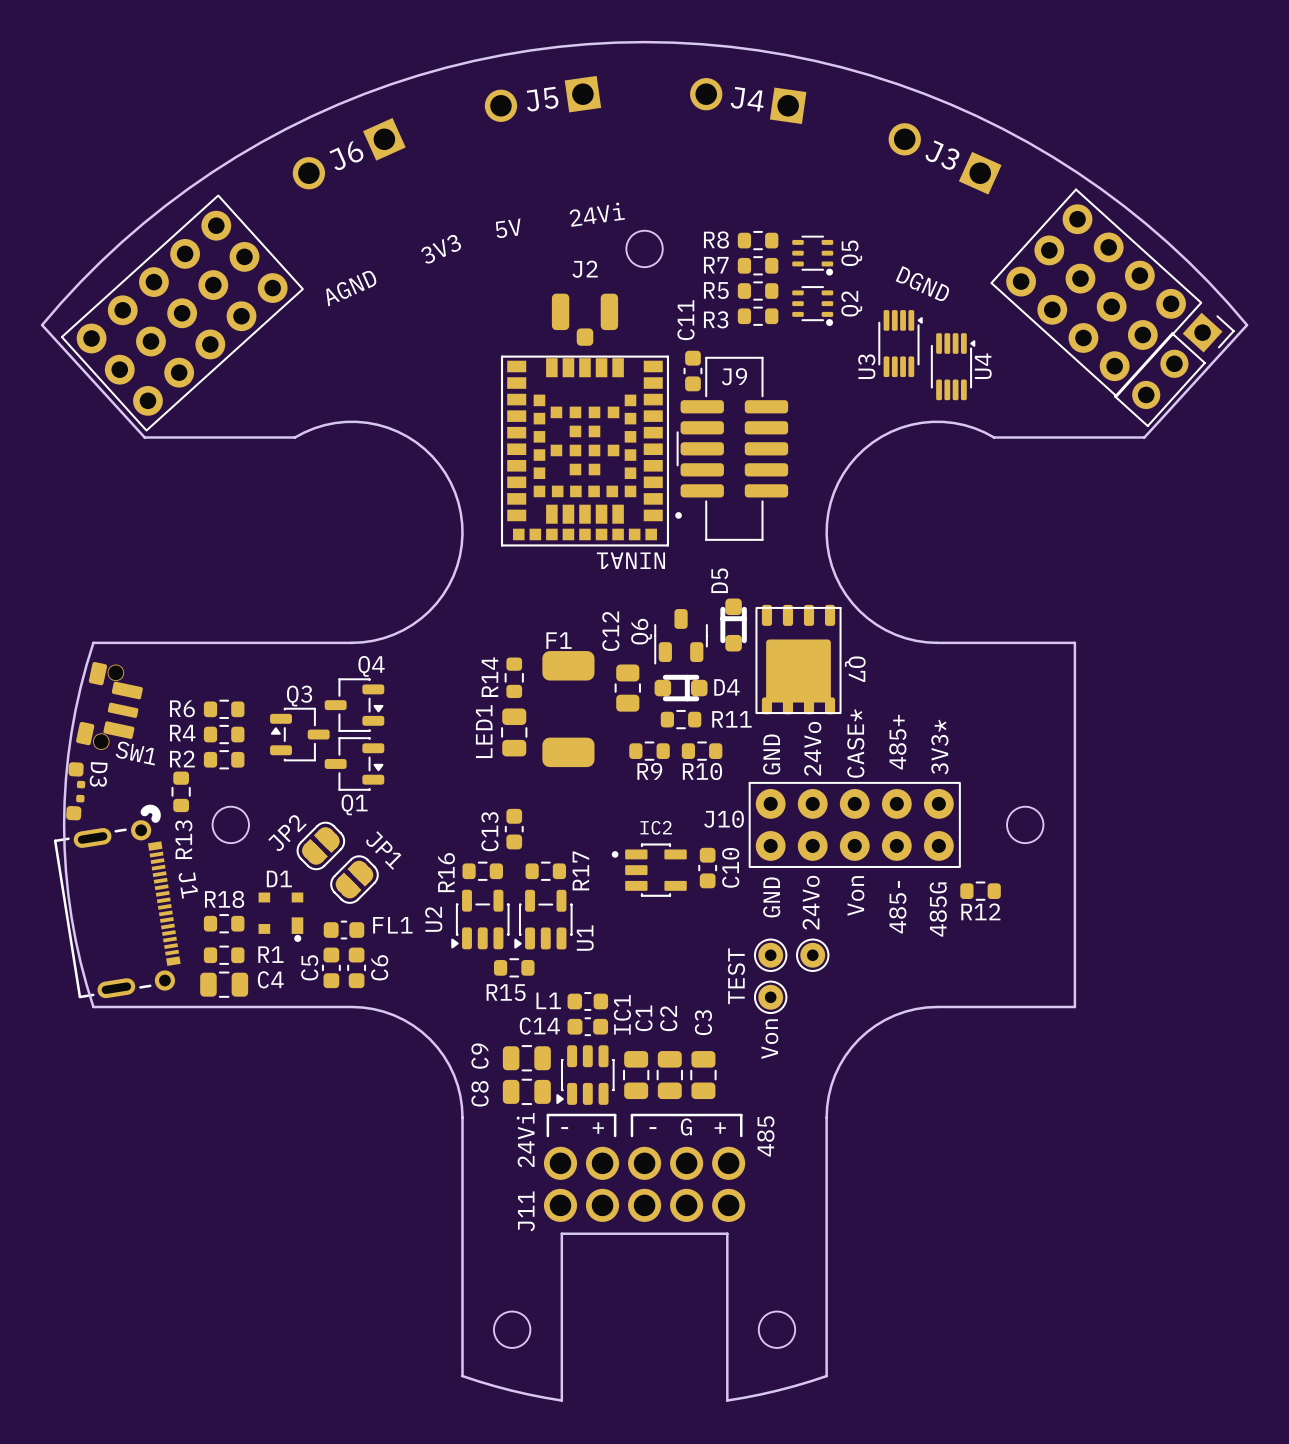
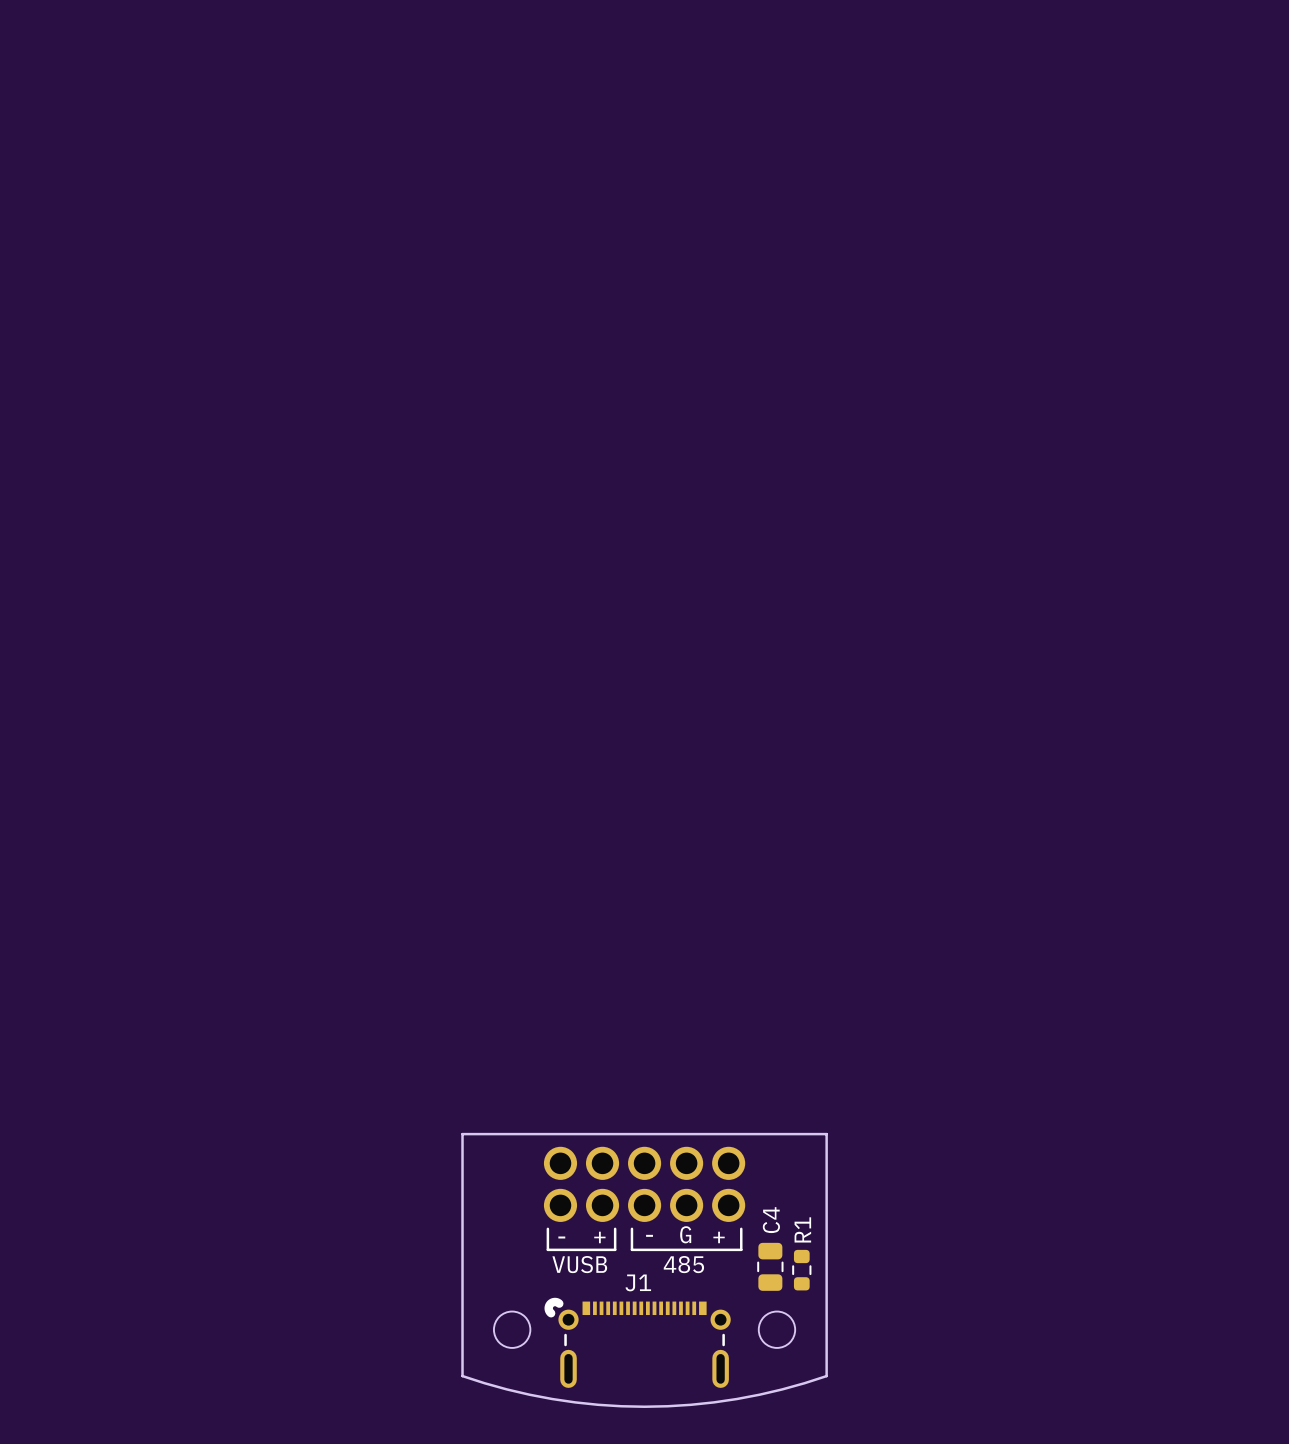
J5: (543, 98) -> none
J4: (748, 101) -> none
J6: (349, 153) -> none
J3: (945, 158) -> none
text: 24Vi (597, 214) -> none
text: 5V (508, 228) -> none
round board edge: [625, 229, 664, 268] -> none
R8: (758, 240) -> none
text: 3V3 (441, 249) -> none
Q5: (812, 255) -> none
R7: (758, 265) -> none
text: DGND (922, 283) -> none
text: AGND (351, 288) -> none
R5: (758, 291) -> none
part: (1096, 292) -> none
Q2: (812, 306) -> none
part: (182, 313) -> none
R3: (758, 316) -> none
J2: (584, 319) -> none
U3: (900, 343) -> none
U4: (953, 366) -> none
part: (1174, 369) -> none
C11: (692, 371) -> none
J9: (732, 448) -> none
NINA1: (591, 451) -> none
D5: (733, 625) -> none
Q6: (681, 636) -> none
Q7: (798, 659) -> none
R14: (514, 677) -> none
C12: (627, 688) -> none
D4: (681, 688) -> none
SW1: (109, 705) -> none
Q4: (354, 705) -> none
R6: (224, 709) -> none
F1: (568, 709) -> none
R11: (681, 719) -> none
LED1: (514, 732) -> none
R4: (224, 734) -> none
Q3: (299, 734) -> none
text: 485+ (897, 742) -> none
text: CASE* (855, 743) -> none
text: 3V3* (939, 747) -> none
text: 24Vo (812, 748) -> none
R9: (649, 751) -> none
R10: (702, 751) -> none
text: GND (771, 754) -> none
R2: (224, 759) -> none
Q1: (354, 763) -> none
D3: (75, 791) -> none
R13: (181, 791) -> none
J1 footprint: [53, 804, 181, 999] -> [544, 1297, 731, 1388]
round board edge: [211, 805, 250, 844] -> none
round board edge: [1006, 805, 1045, 844] -> none
J10: (854, 824) -> none
C13: (514, 829) -> none
JP2: (320, 845) -> none
C10: (707, 868) -> none
IC2: (649, 870) -> none
R16: (482, 871) -> none
R17: (545, 871) -> none
JP1: (354, 879) -> none
J1 name position: J1 (188, 885) -> J1 (638, 1282)
R12: (980, 891) -> none
text: Von (855, 895) -> none
text: GND (771, 897) -> none
text: 24Vo (811, 902) -> none
text: 485- (897, 907) -> none
text: 485G (938, 909) -> none
D1: (280, 917) -> none
U2: (480, 919) -> none
U1: (543, 919) -> none
R18: (224, 923) -> none
FL1: (343, 930) -> none
R1 name position: R1 (270, 954) -> R1 (802, 1229)
R1 rotation: 0° (224, 955) -> 90° clockwise (801, 1270)
R1 position: (224, 955) -> (801, 1270)
part: (770, 955) -> none
part: (812, 955) -> none
C5: (331, 967) -> none
C6: (356, 967) -> none
R15: (514, 967) -> none
text: TEST (736, 976) -> none
C4 name position: C4 (270, 979) -> C4 (771, 1220)
C4 rotation: 0° (224, 984) -> 90° clockwise (770, 1266)
C4 position: (224, 984) -> (770, 1266)
part: (770, 997) -> none
L1: (587, 1001) -> none
C14: (587, 1026) -> none
text: Von (769, 1039) -> none
C9: (526, 1058) -> none
IC1: (585, 1075) -> none
C1: (636, 1075) -> none
C2: (669, 1075) -> none
C3: (703, 1075) -> none
C8: (526, 1091) -> none
text position: G (686, 1127) -> G (685, 1234)
text: - (564, 1128) -> none
text: + (598, 1128) -> none
text: - (652, 1128) -> none
text: + (720, 1128) -> none
board edge: (462, 1134) (460, 1095) (454, 1075) (443, 1056) (430, 1039) (413, 1025) (384, 1011) (351, 1006) (93, 1006) (80, 962) (71, 917) (65, 871) (64, 824) (65, 778) (71, 732) (80, 687) (93, 642) (351, 642) (373, 640) (393, 634) (421, 618) (436, 603) (448, 585) (457, 566) (461, 545) (462, 523) (458, 502) (450, 482) (432, 456) (416, 442) (387, 427) (367, 422) (335, 423) (314, 428) (295, 437) (144, 437) (42, 325) (100, 262) (165, 205) (236, 157) (311, 116) (391, 84) (474, 60) (558, 46) (644, 42) (730, 46) (815, 60) (897, 84) (977, 116) (1053, 157) (1123, 205) (1188, 262) (1247, 325) (1144, 437) (994, 437) (964, 425) (943, 421) (922, 422) (891, 431) (872, 442) (849, 464) (838, 482) (830, 502) (826, 523) (827, 545) (831, 566) (840, 585) (852, 603) (876, 624) (905, 638) (926, 642) (1074, 642) (1074, 1006) (926, 1007) (905, 1011) (885, 1020) (859, 1039) (839, 1065) (828, 1095) (826, 1134) -> (462, 1134) (826, 1134)
line: (547, 1136) (547, 1115) (615, 1115) (615, 1136) -> none
line: (631, 1136) (631, 1115) (741, 1115) (741, 1136) -> none
text rotation: 0° (765, 1136) -> 90° clockwise (683, 1264)
text position: 485 (765, 1136) -> 485 (683, 1264)
text: 24Vi (525, 1140) -> none
J11 name: J11 (526, 1211) -> none
line: none -> (547, 1228) (547, 1249) (615, 1249) (615, 1228)
line: none -> (631, 1228) (631, 1249) (741, 1249) (741, 1228)
text: none -> - (649, 1235)
text: none -> - (561, 1237)
text: none -> + (599, 1237)
text: none -> + (719, 1237)
text: none -> VUSB (579, 1264)
board edge: (462, 1376) (511, 1390) (561, 1400) (561, 1233) (727, 1233) (727, 1400) (777, 1390) (826, 1376) -> (462, 1376) (506, 1389) (552, 1399) (598, 1404) (644, 1406) (690, 1404) (736, 1399) (782, 1389) (826, 1376)

